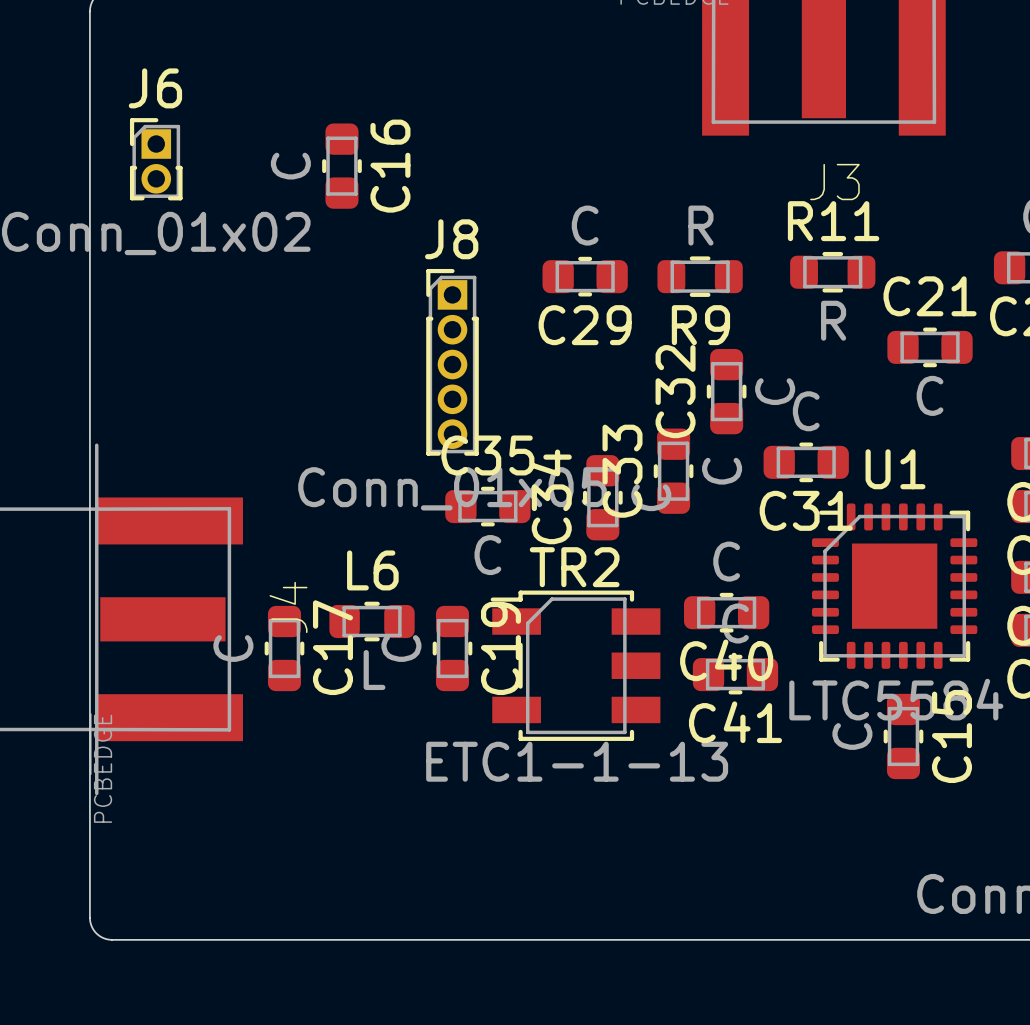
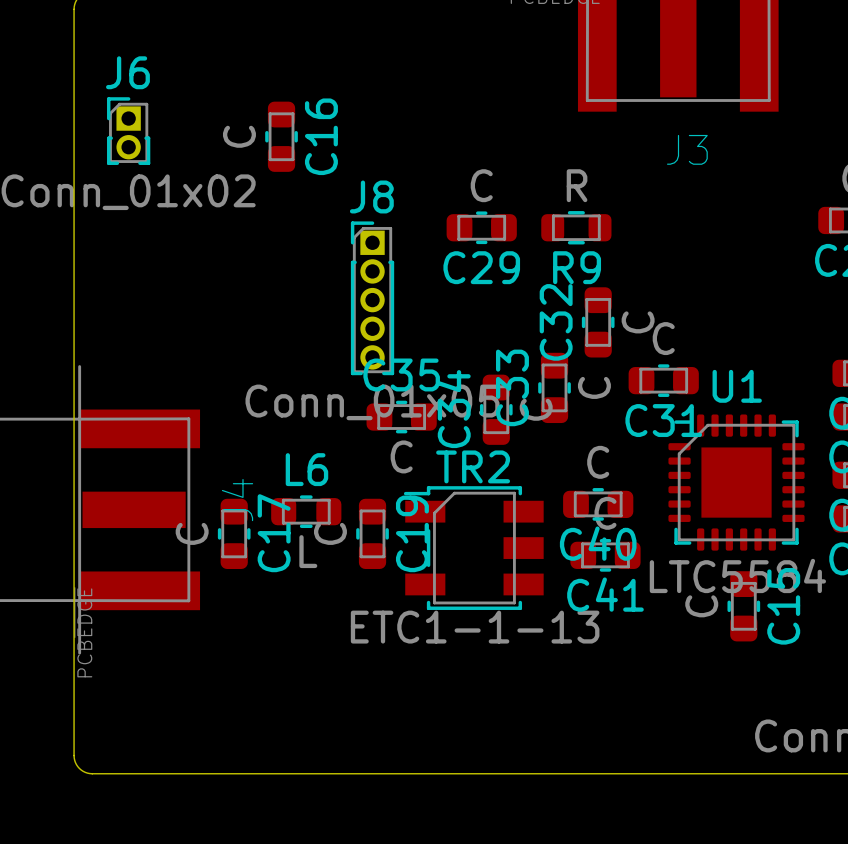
R11: R (832, 272) -> none
C21: C (930, 347) -> none

